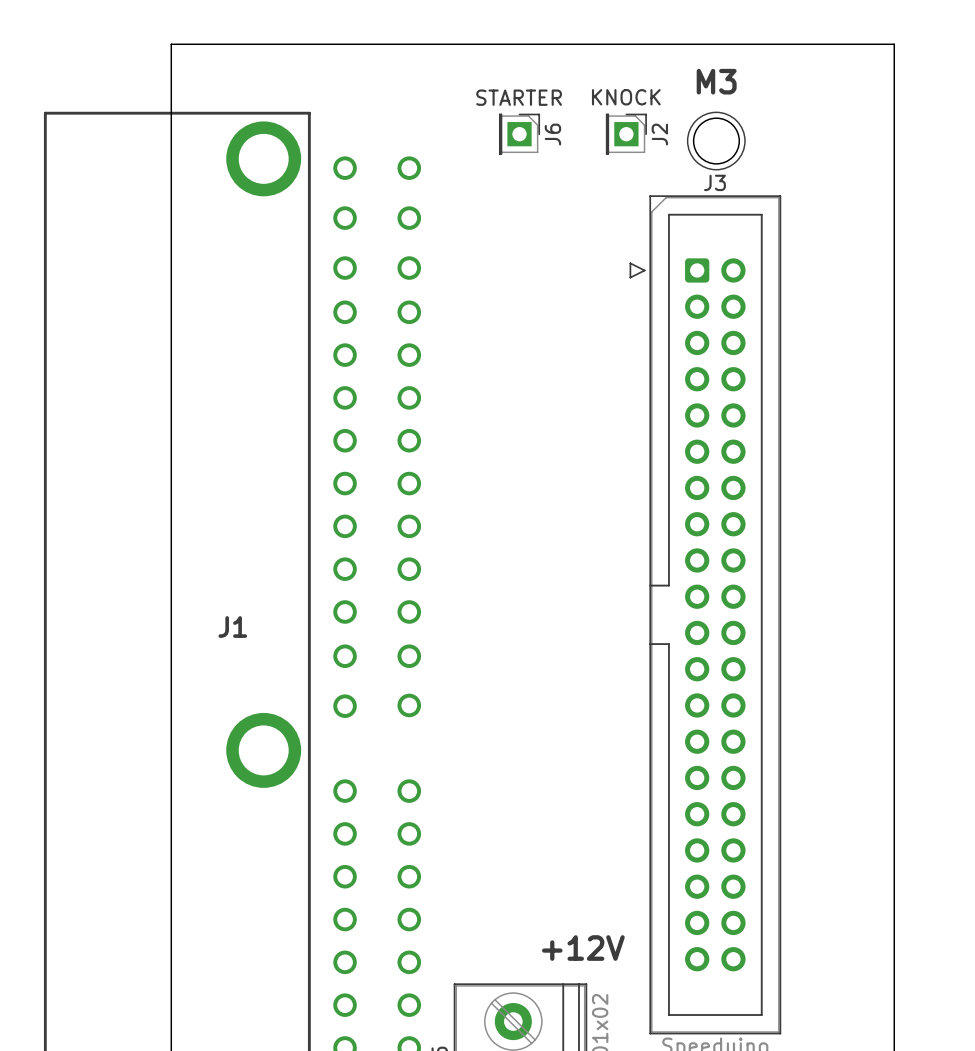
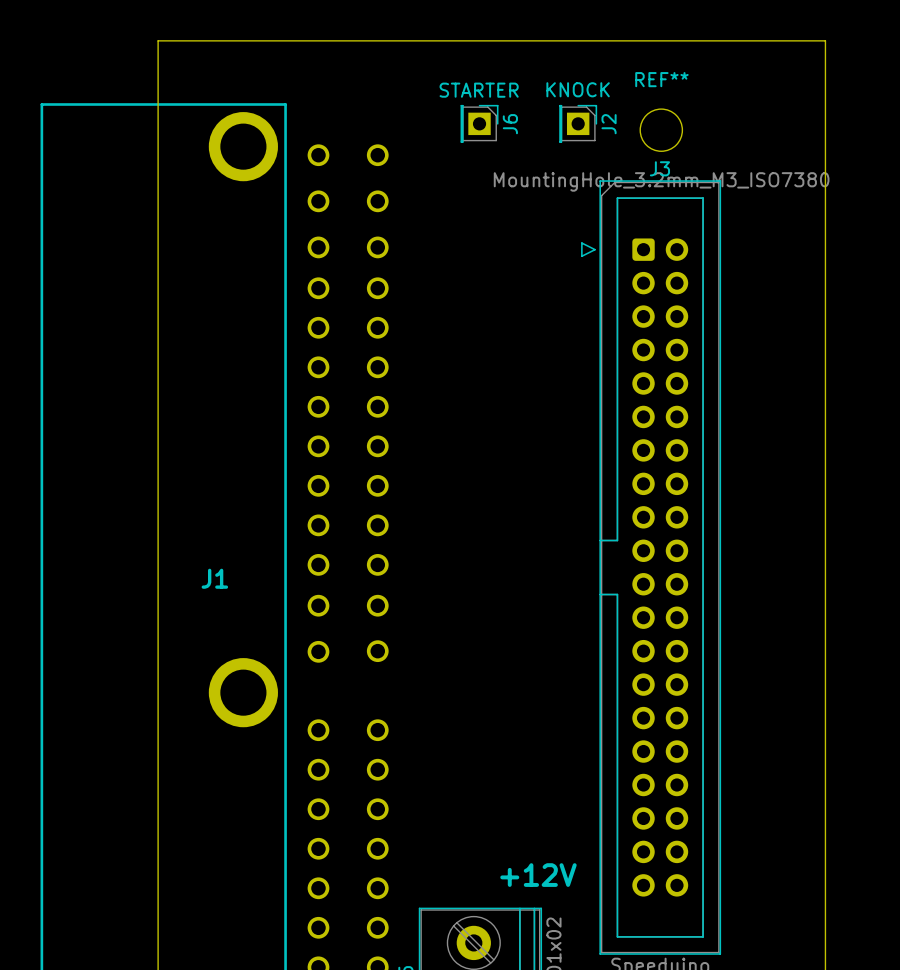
text: M3 (716, 81) -> none
REF** name: none -> REF** (661, 79)
drawing: [686, 111, 746, 171] -> none
REF** value: none -> MountingHole_3.2mm_M3_ISO7380 (661, 181)

